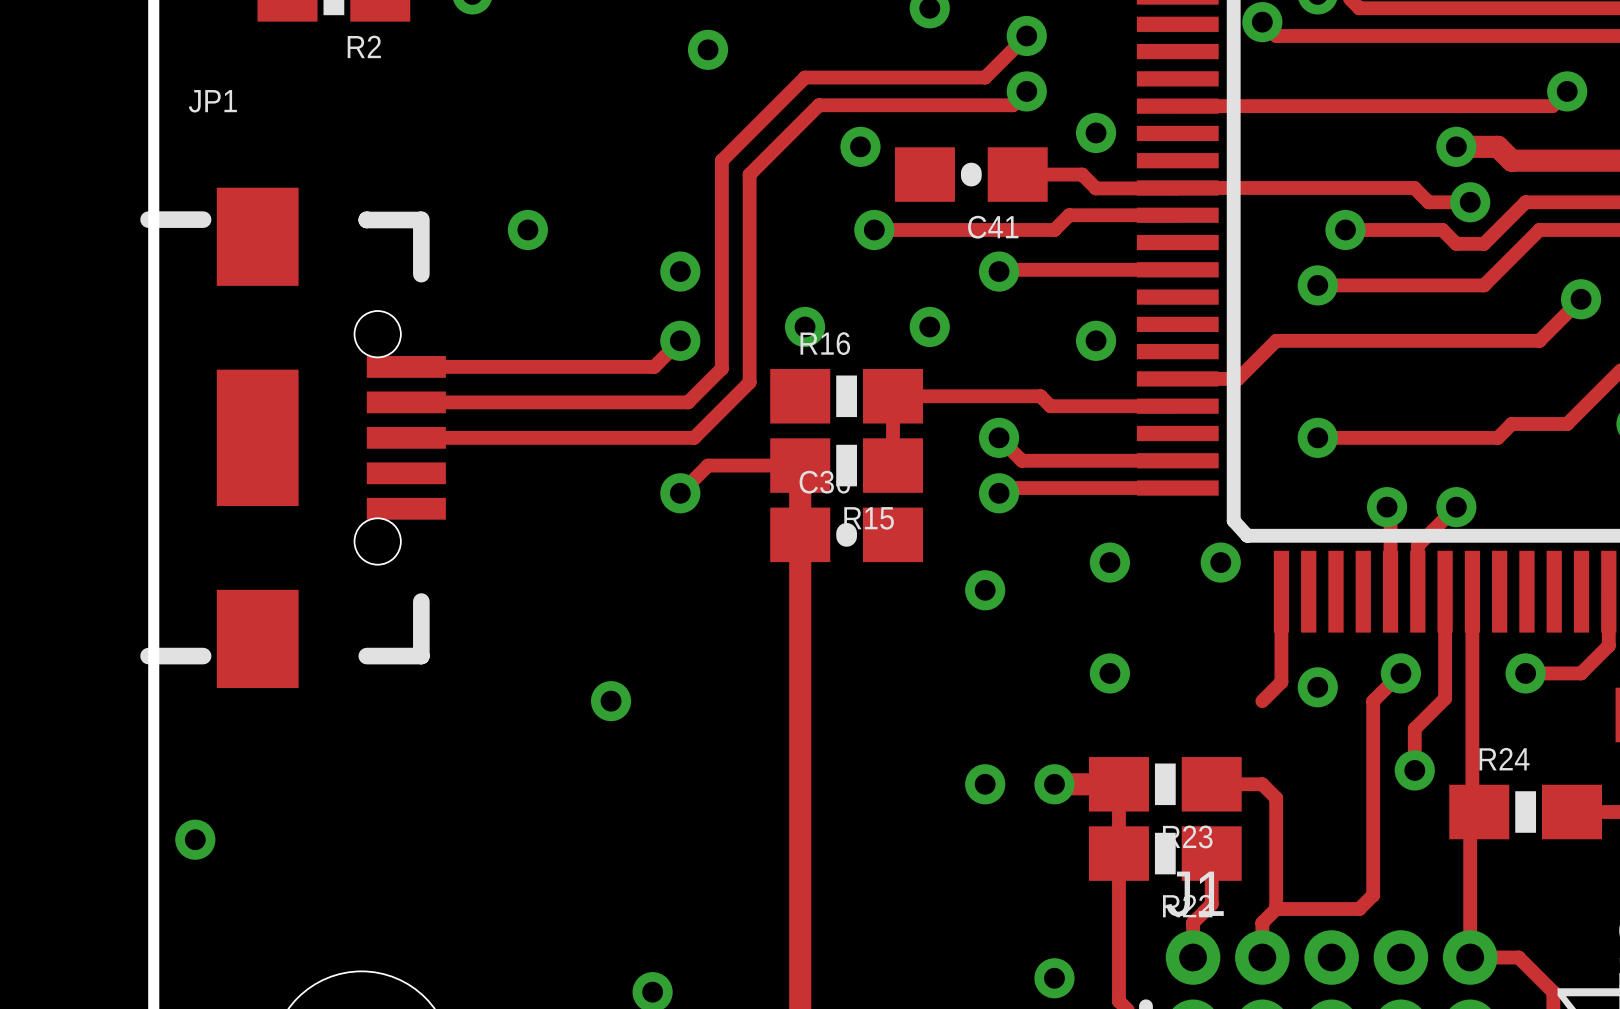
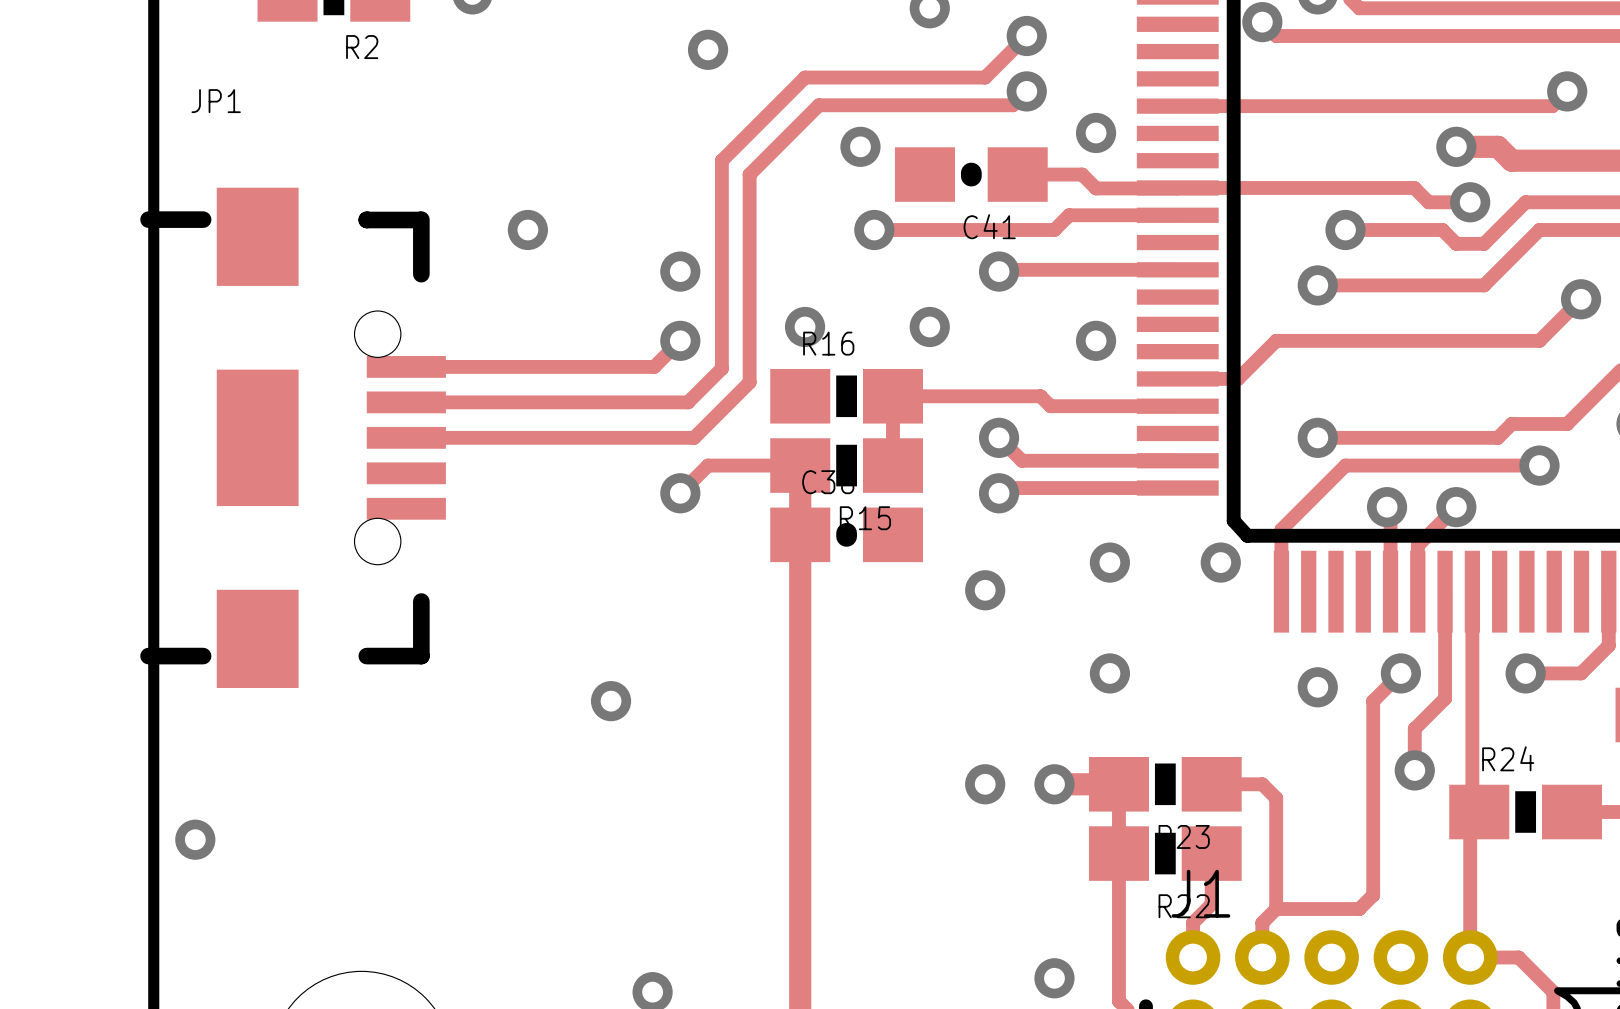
via: none -> (1539, 465)
track: (1281, 591) (1281, 682) (1262, 701) -> (1281, 591) (1281, 529) (1345, 465) (1539, 465)

